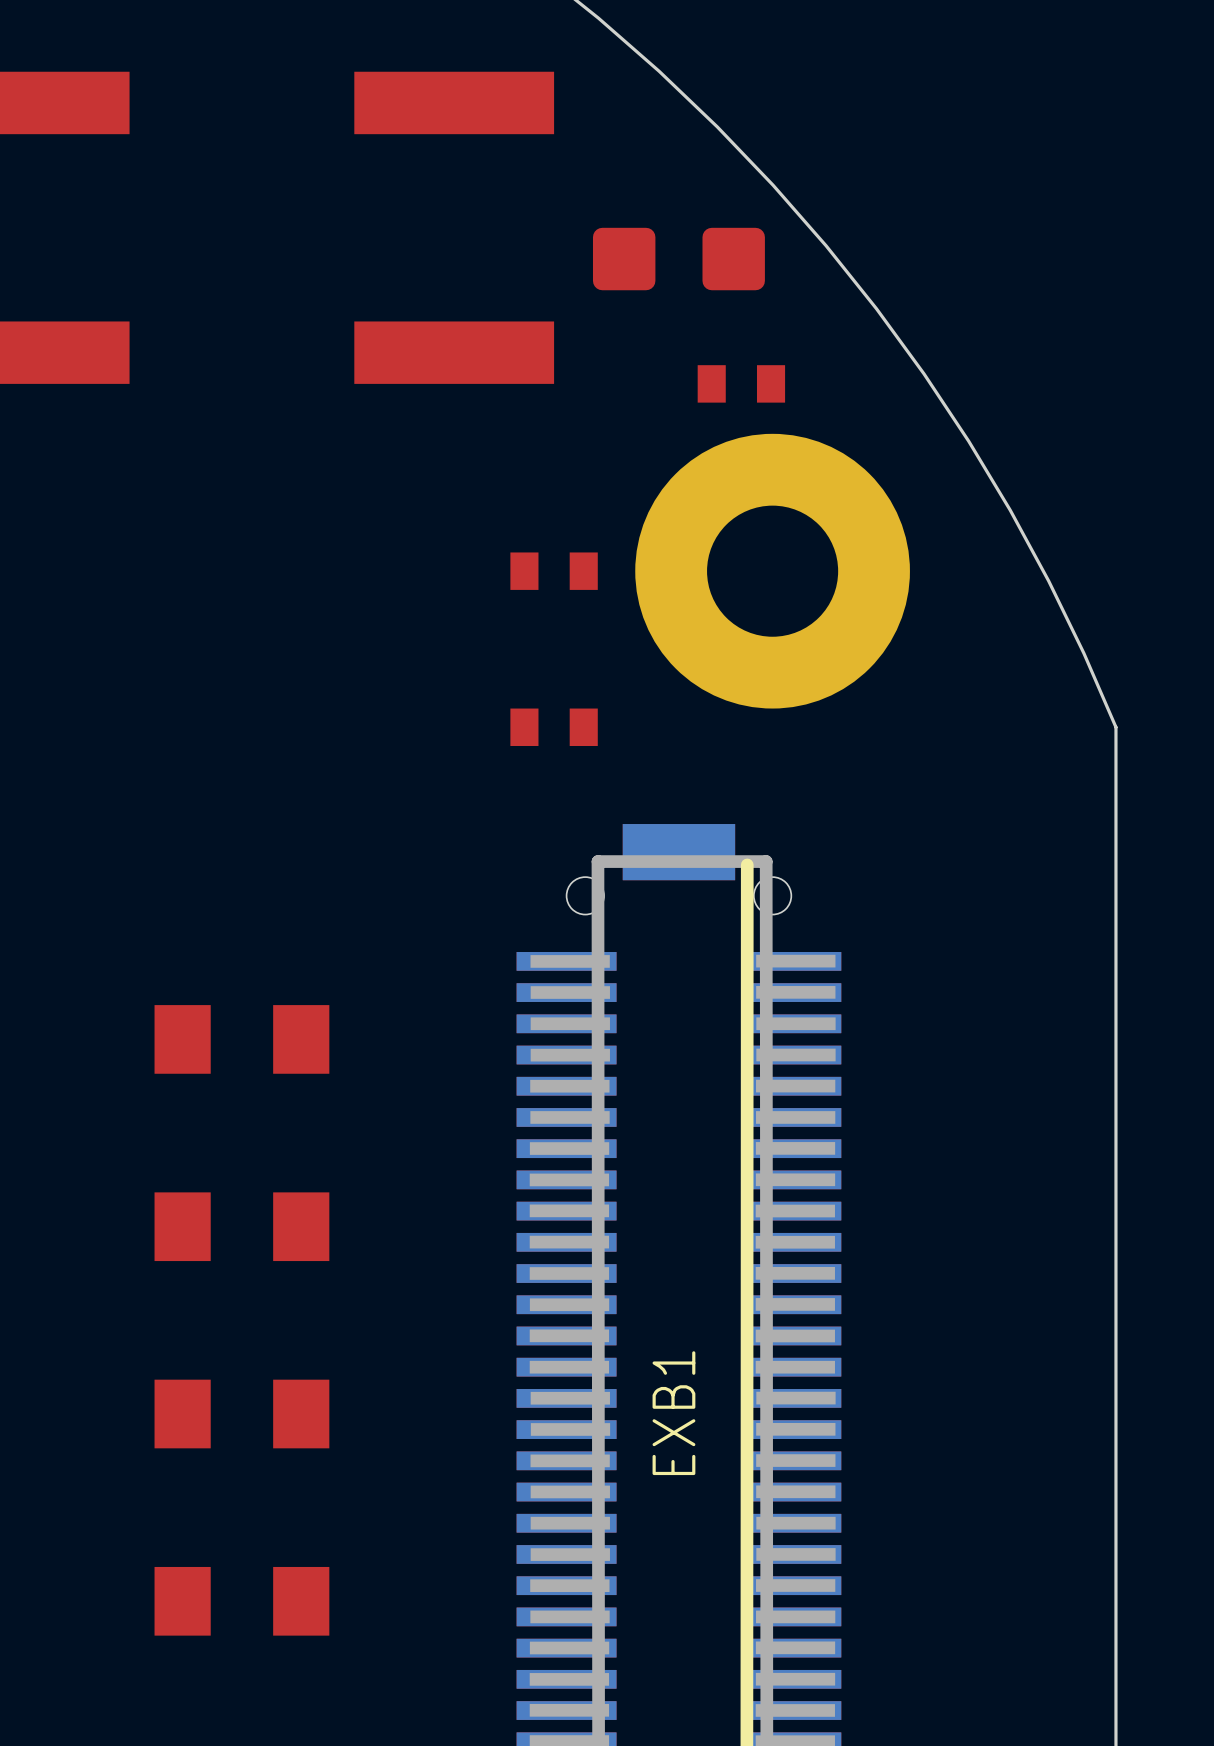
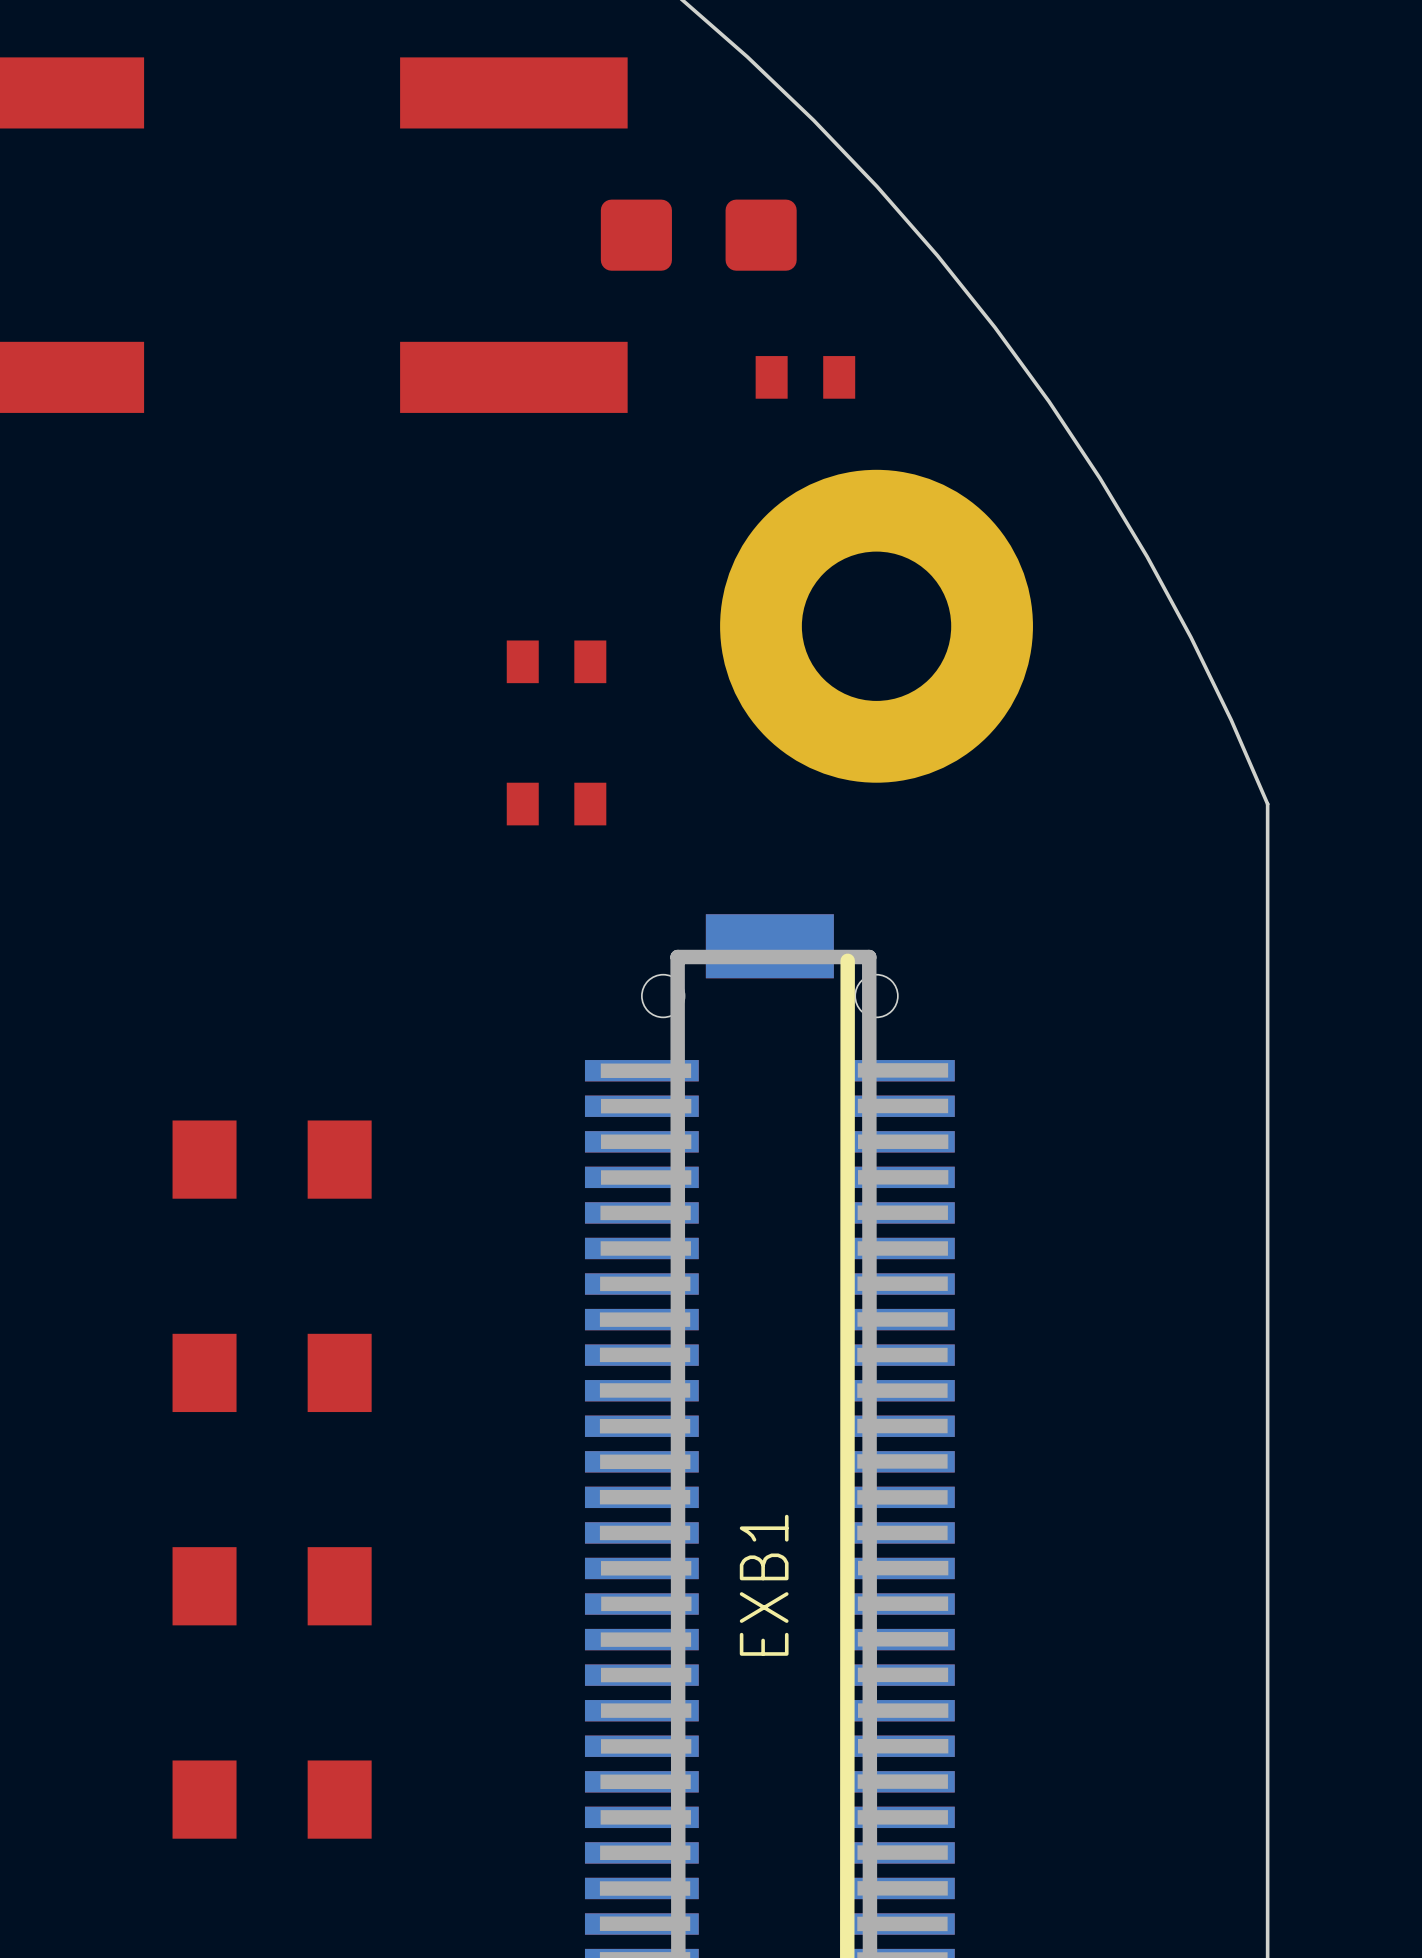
part position: (678, 259) -> (698, 235)
part position: (741, 383) -> (805, 377)
part position: (554, 571) -> (556, 661)
part position: (554, 727) -> (556, 804)

